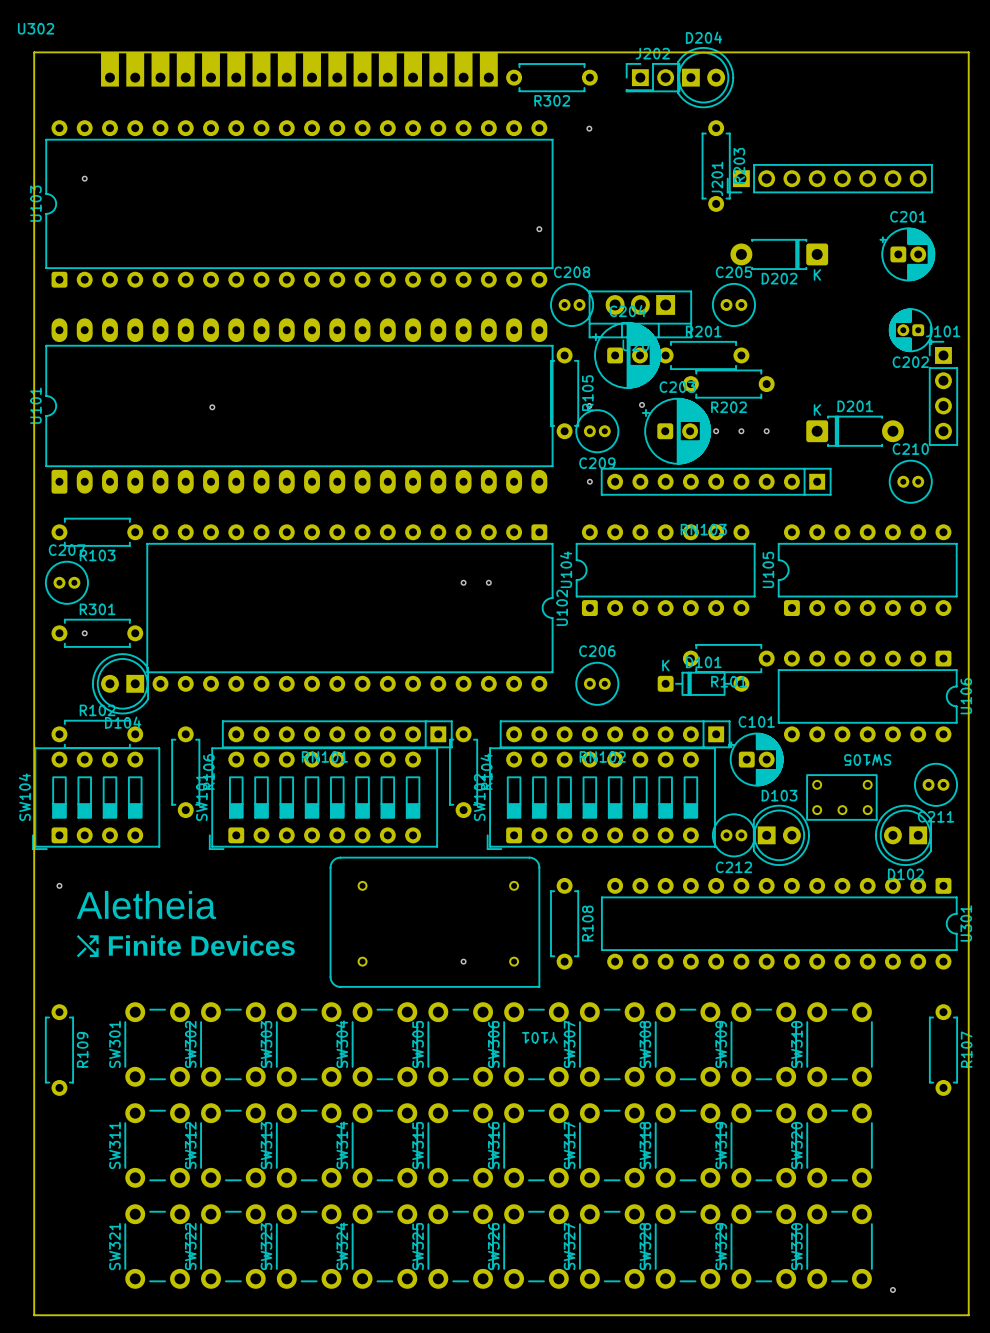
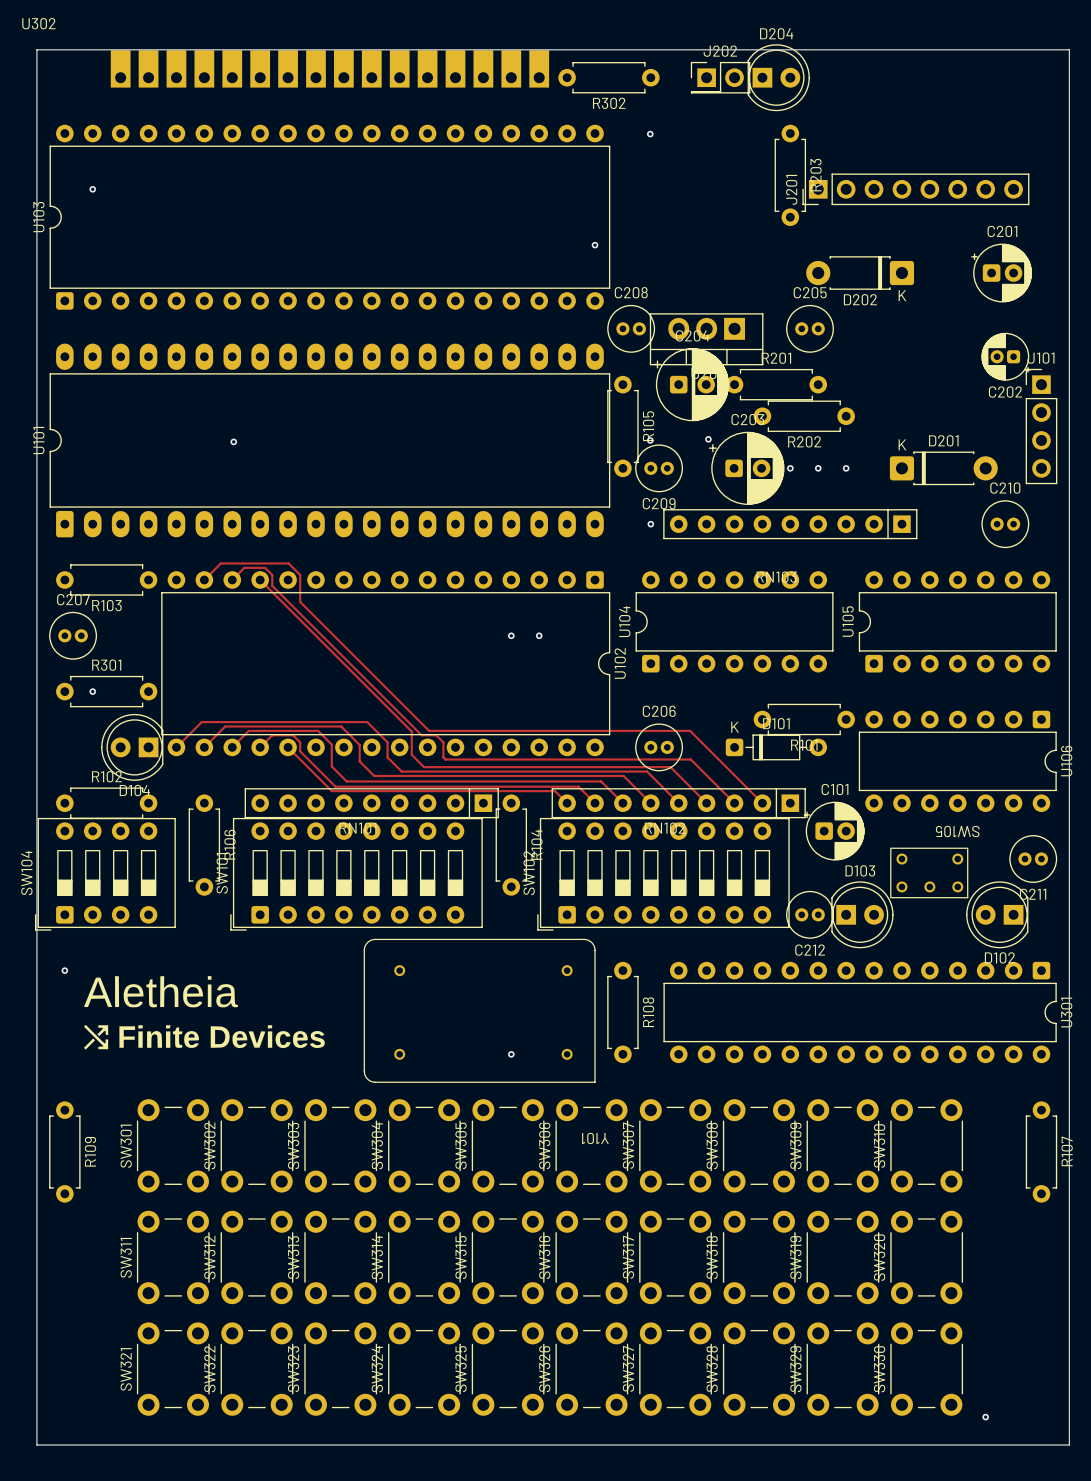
track: none -> (204, 579) (220, 563) (288, 563) (300, 574) (300, 601) (429, 730) (690, 730) (762, 803)
track: none -> (232, 579) (244, 567) (265, 567) (272, 574) (272, 585) (421, 735) (436, 735) (443, 742) (443, 757) (445, 759) (690, 759) (734, 803)
track: none -> (260, 579) (411, 731) (411, 754) (424, 767) (670, 767) (706, 803)
track: none -> (176, 747) (201, 722) (367, 722) (387, 742) (387, 757) (401, 771) (647, 771) (678, 803)
track: none -> (204, 747) (225, 726) (341, 726) (359, 744) (359, 761) (374, 775) (623, 775) (650, 803)
track: none -> (232, 747) (248, 730) (318, 730) (331, 744) (331, 766) (346, 781) (601, 781) (622, 803)
track: none -> (260, 747) (272, 735) (293, 735) (300, 742) (300, 751) (335, 786) (578, 786) (595, 803)
track: none -> (288, 747) (331, 791) (555, 791) (567, 803)

